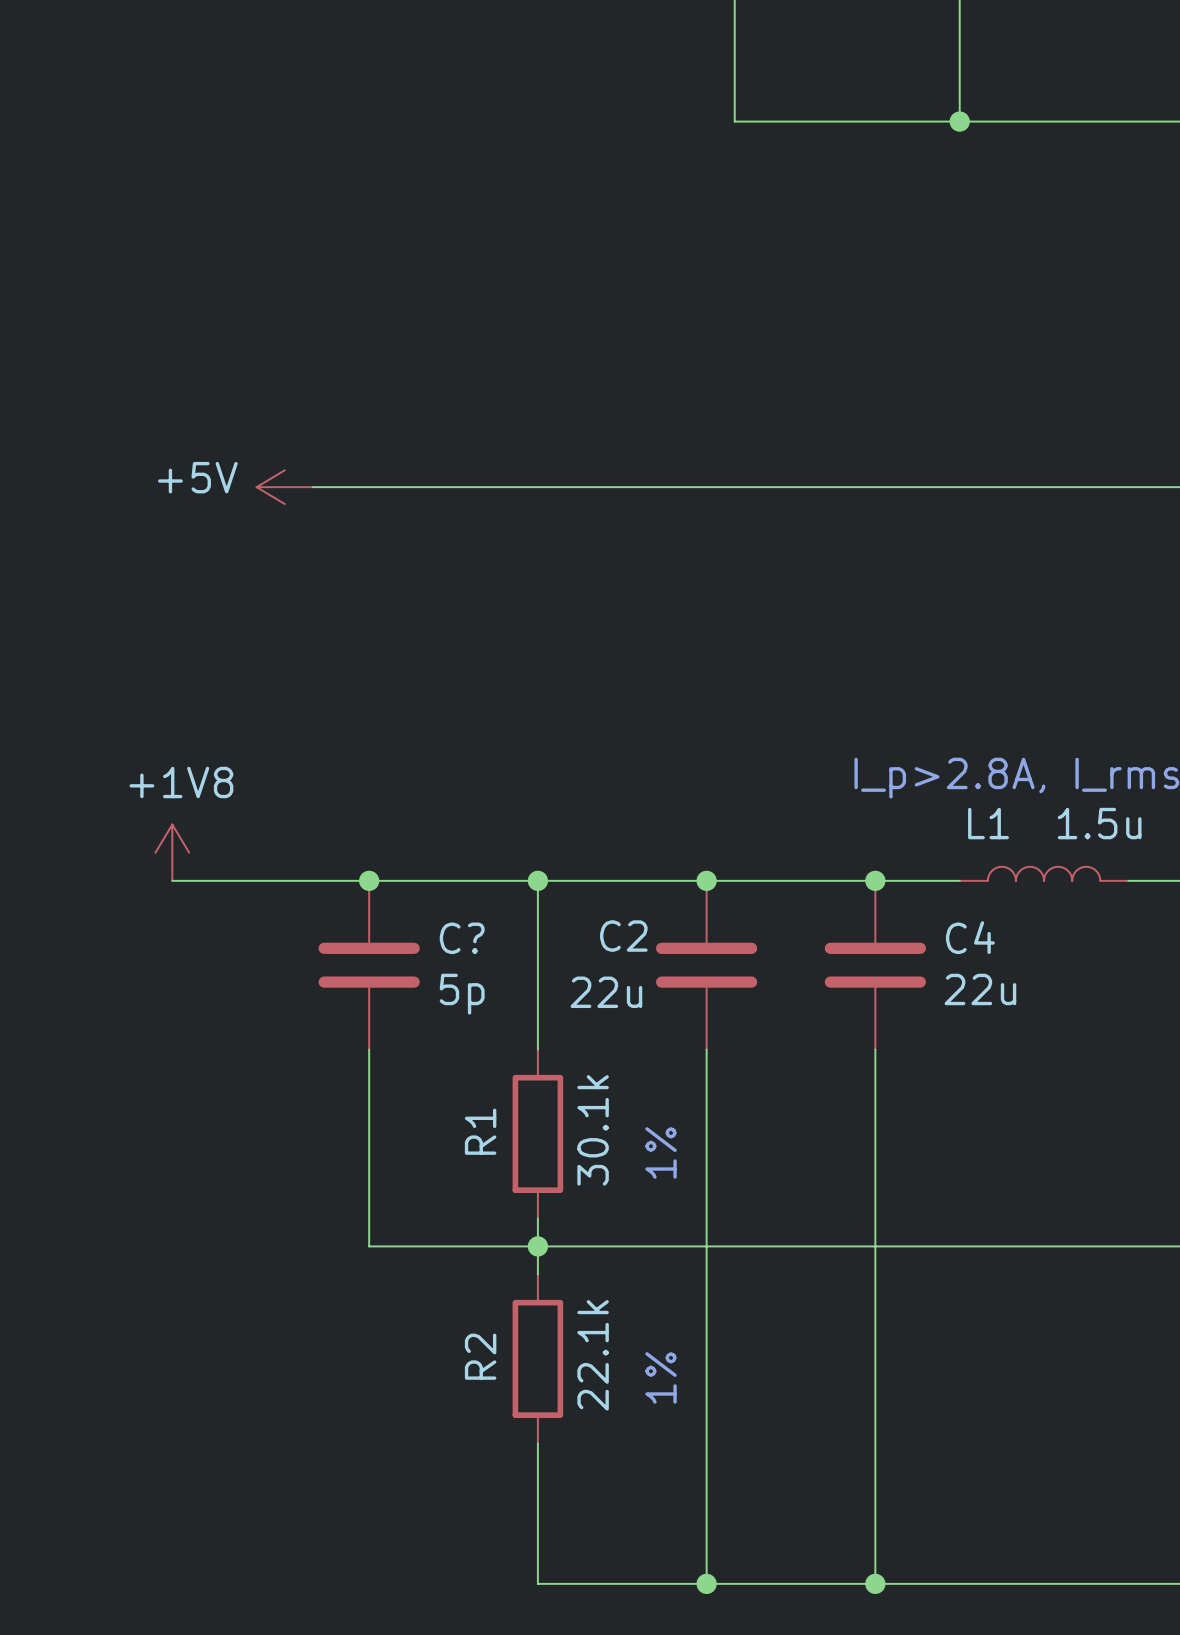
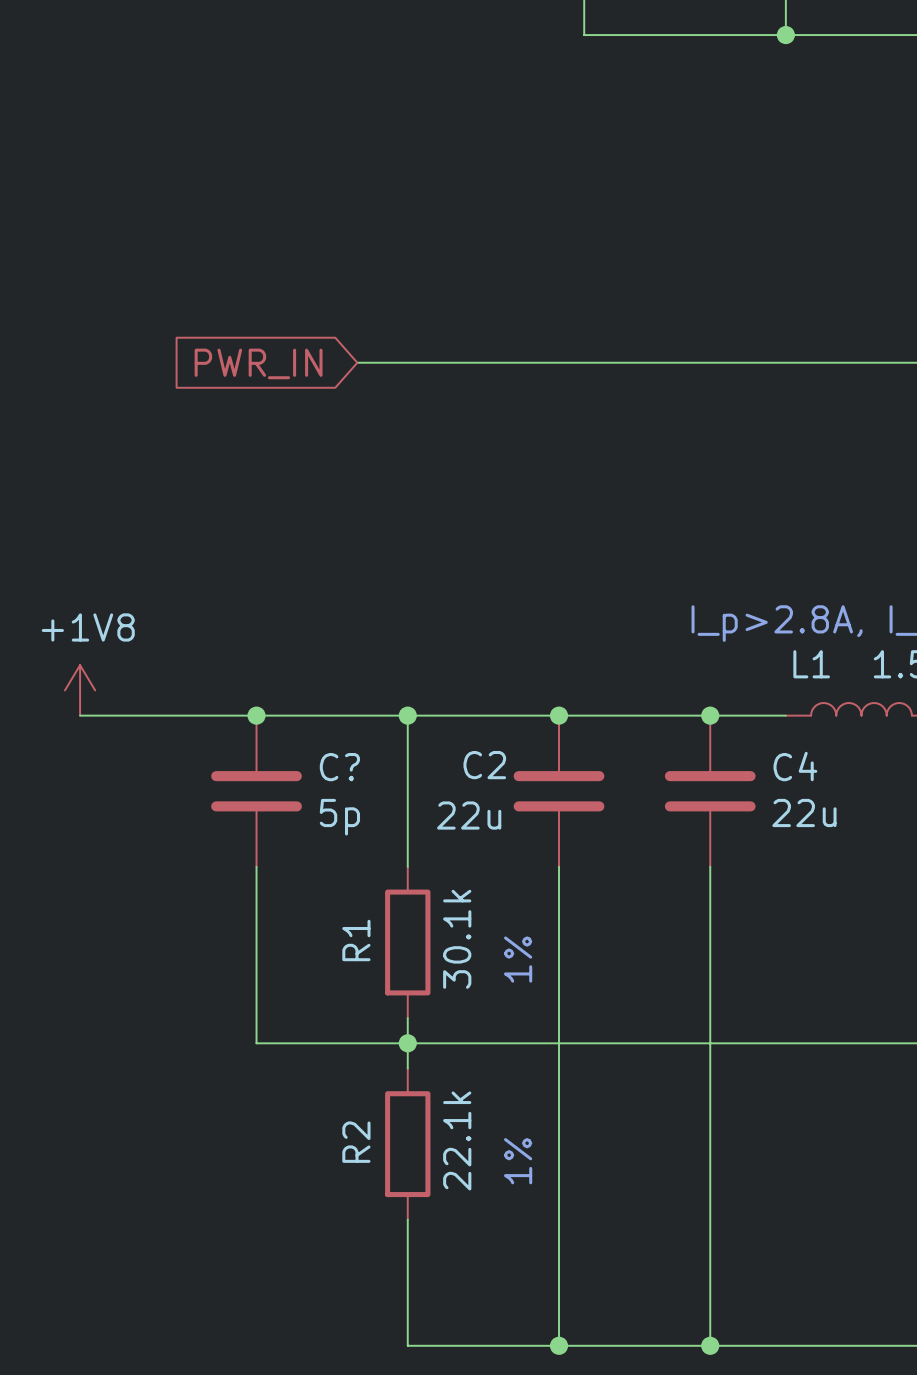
power symbol: +5V (284, 487) -> none
wire: (312, 487) (481, 487) -> none
global label: none -> PWR_IN (258, 363)

